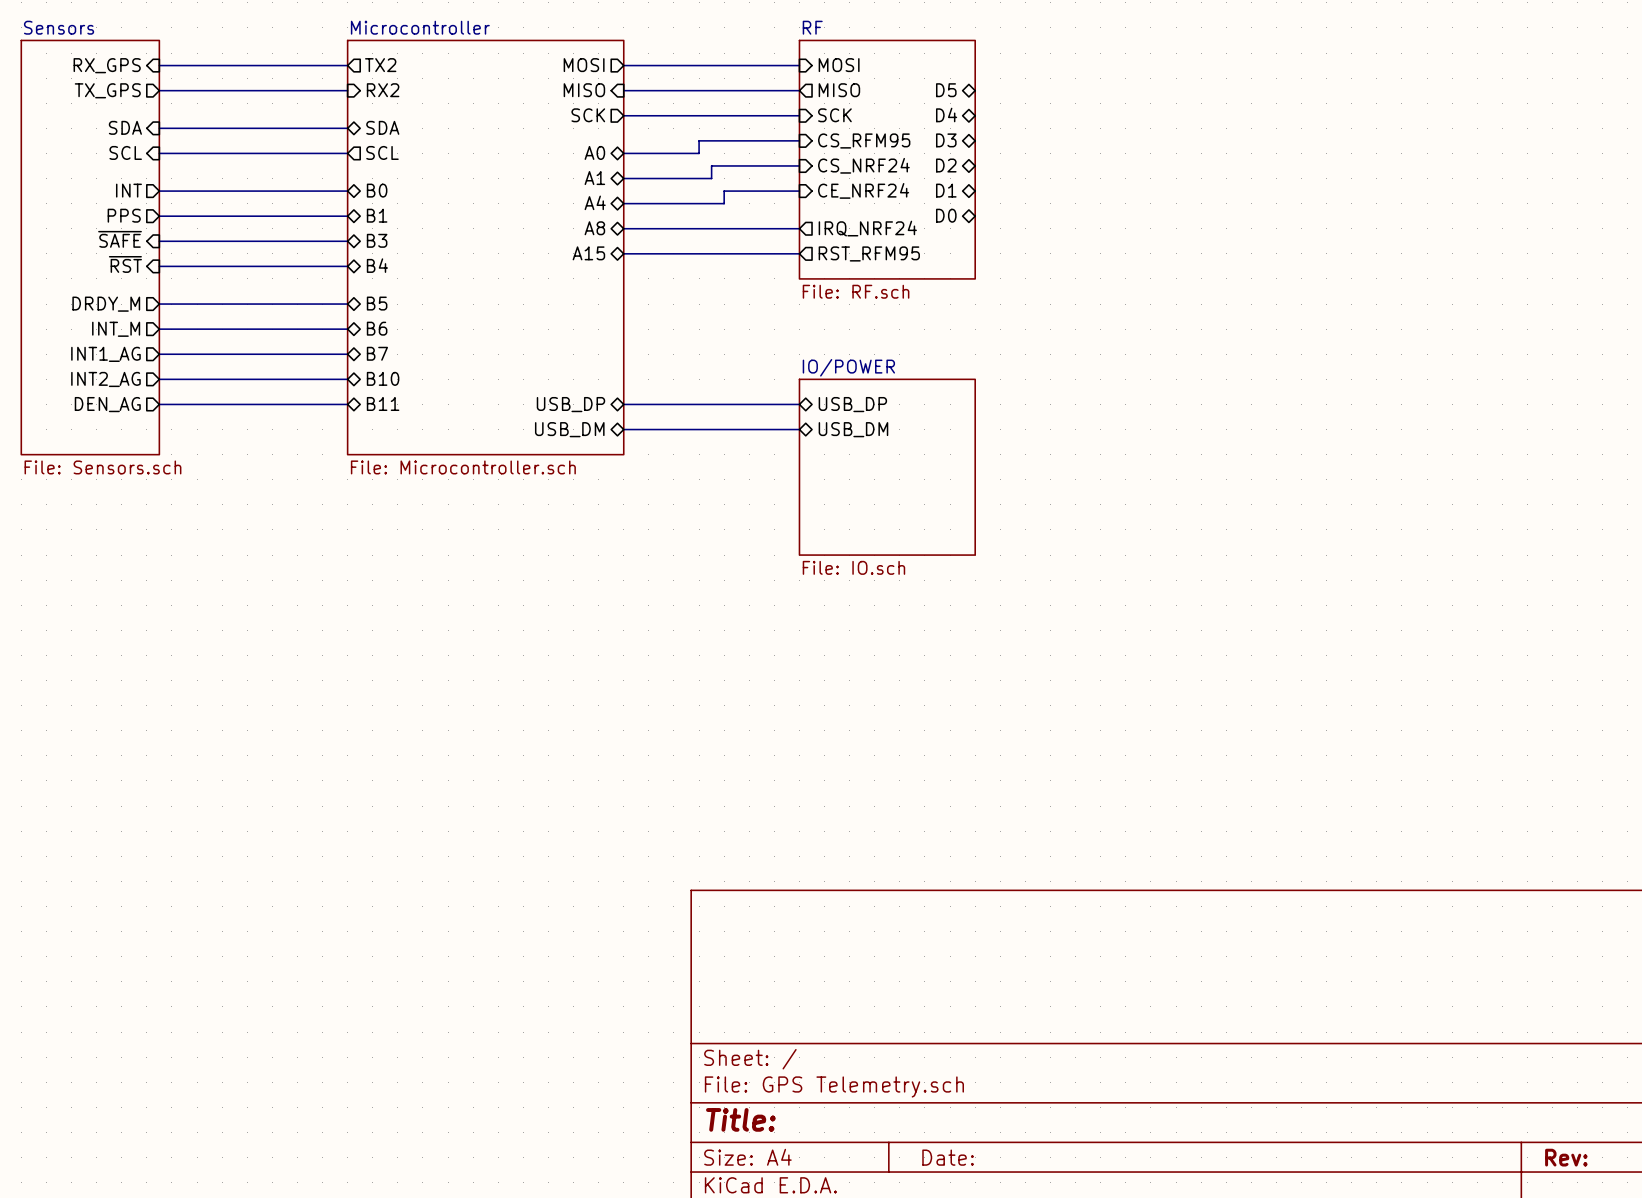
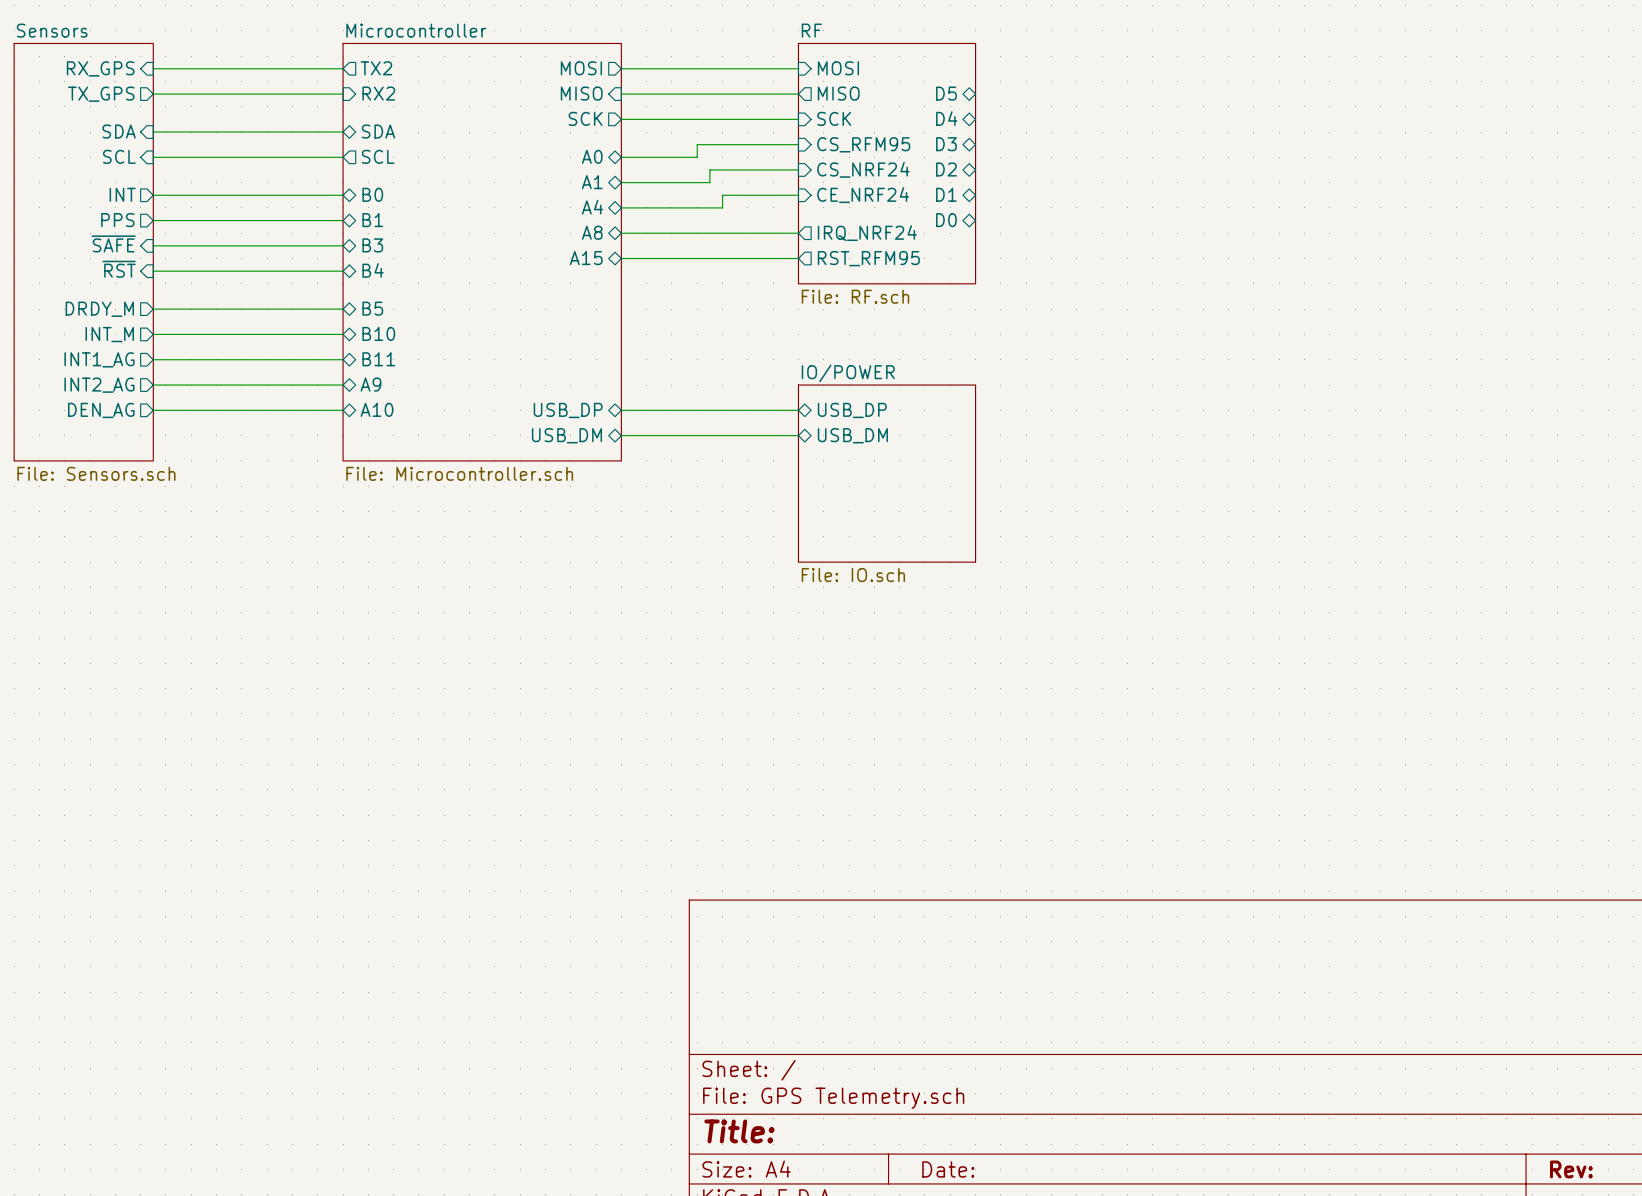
sheet pin: B6 (377, 328) -> B10 (378, 333)
sheet pin: B7 (377, 353) -> B11 (378, 359)
sheet pin: B10 (383, 378) -> A9 (370, 384)
sheet pin: B11 (383, 403) -> A10 (376, 409)

